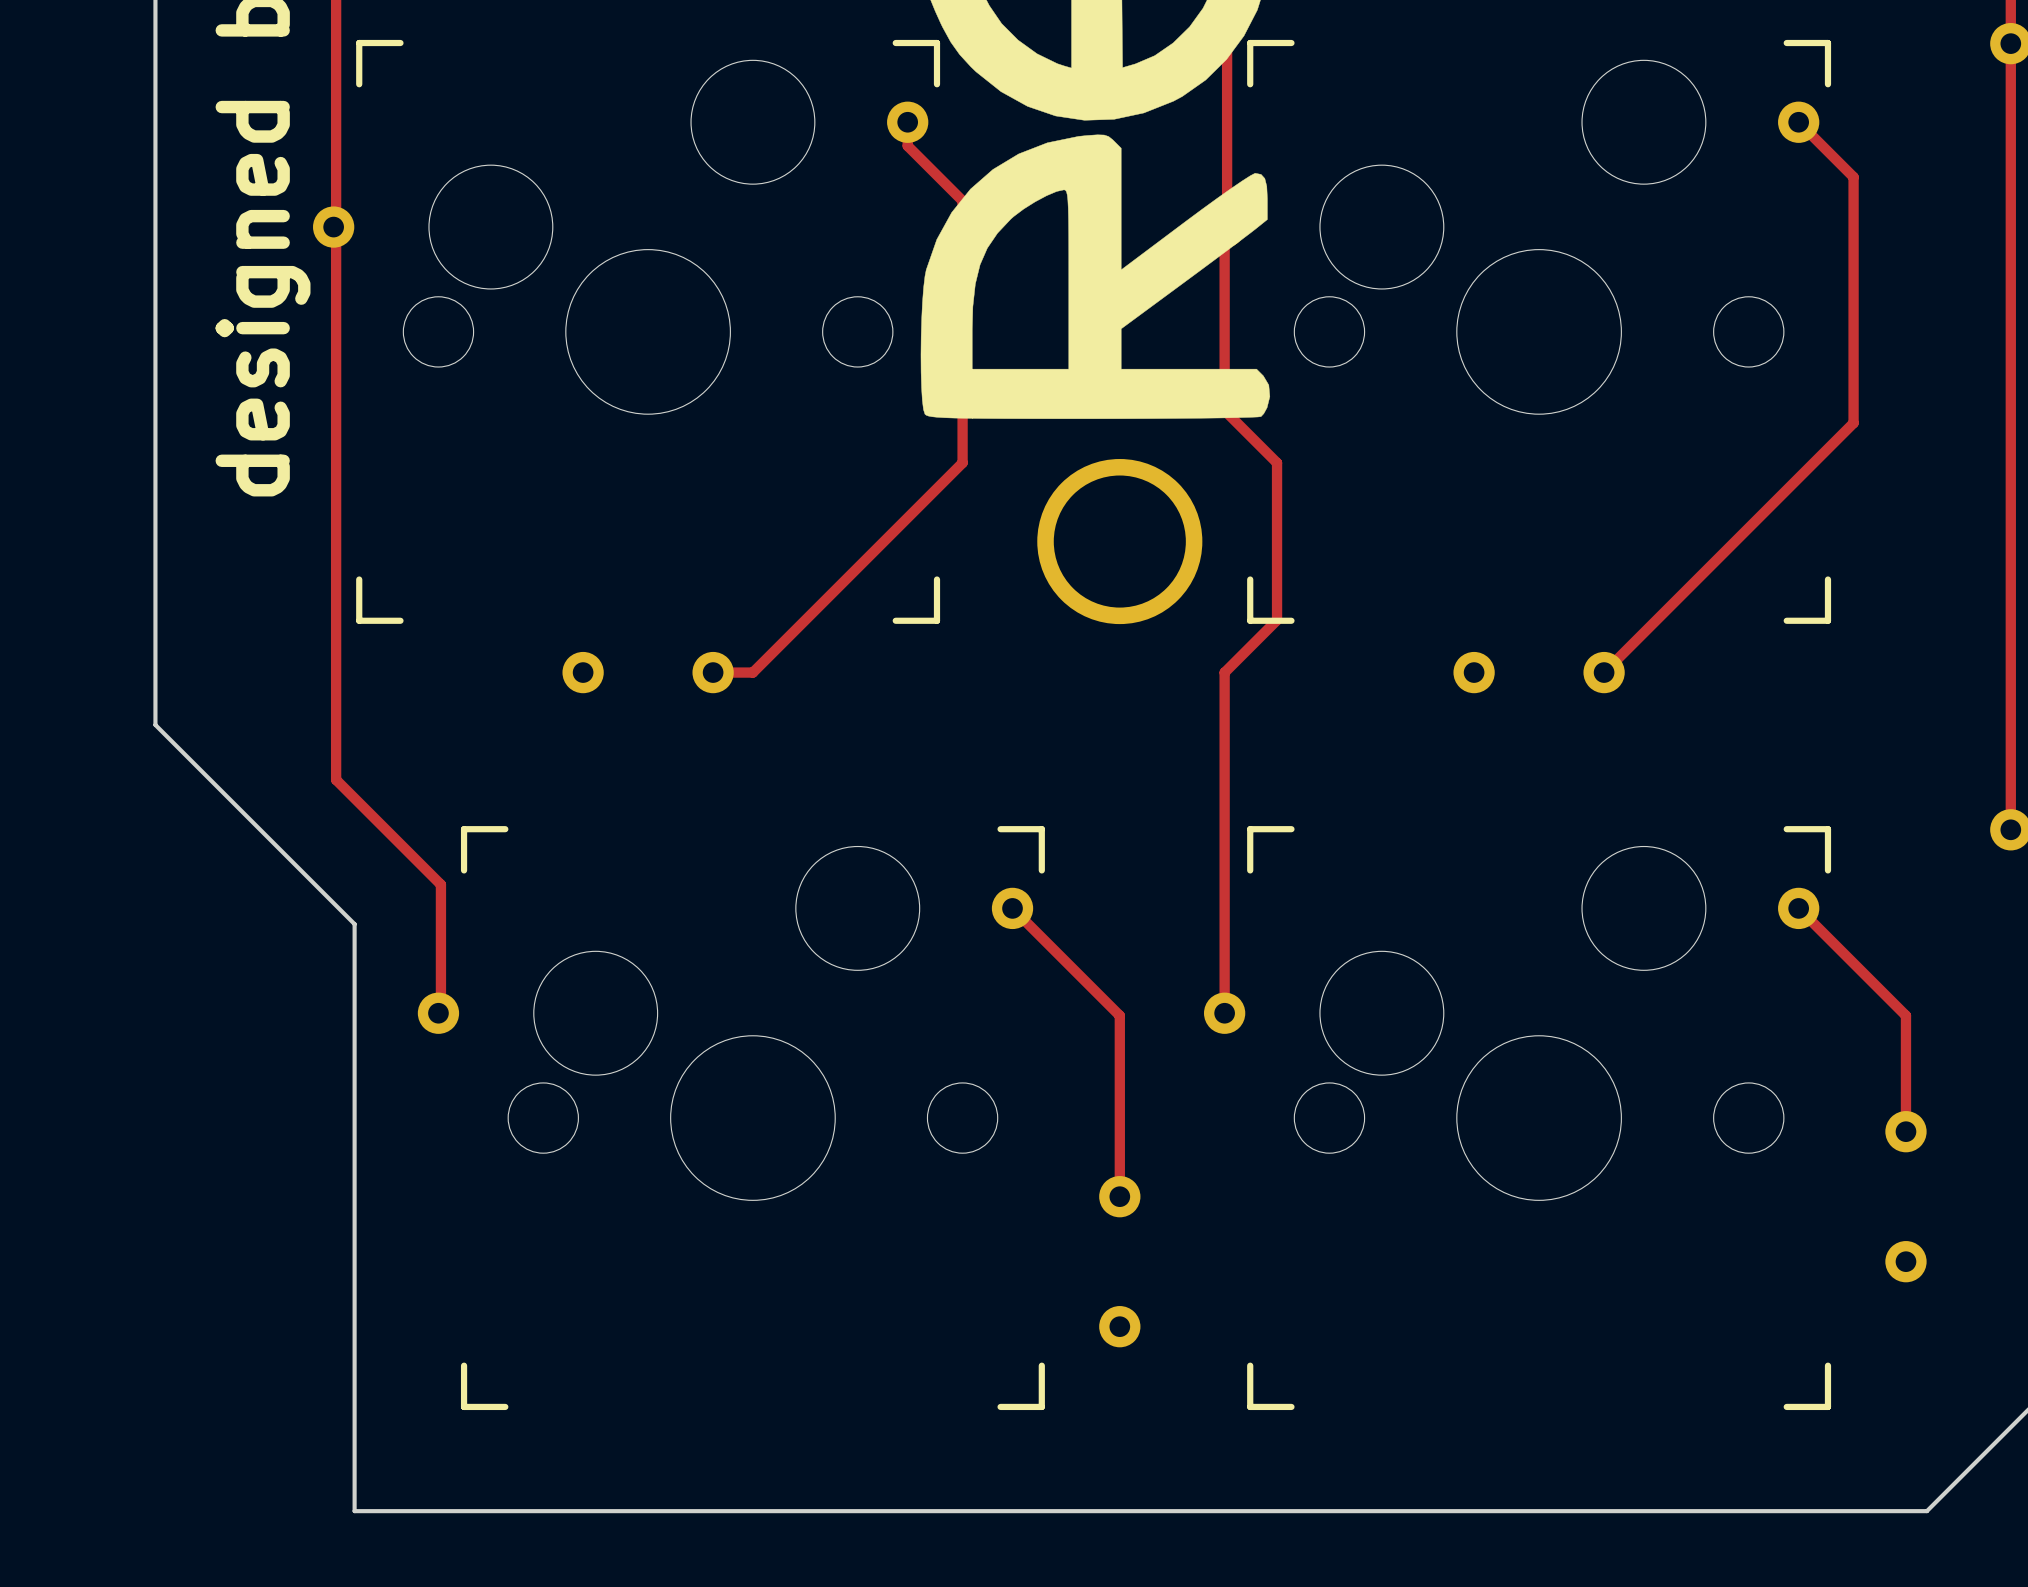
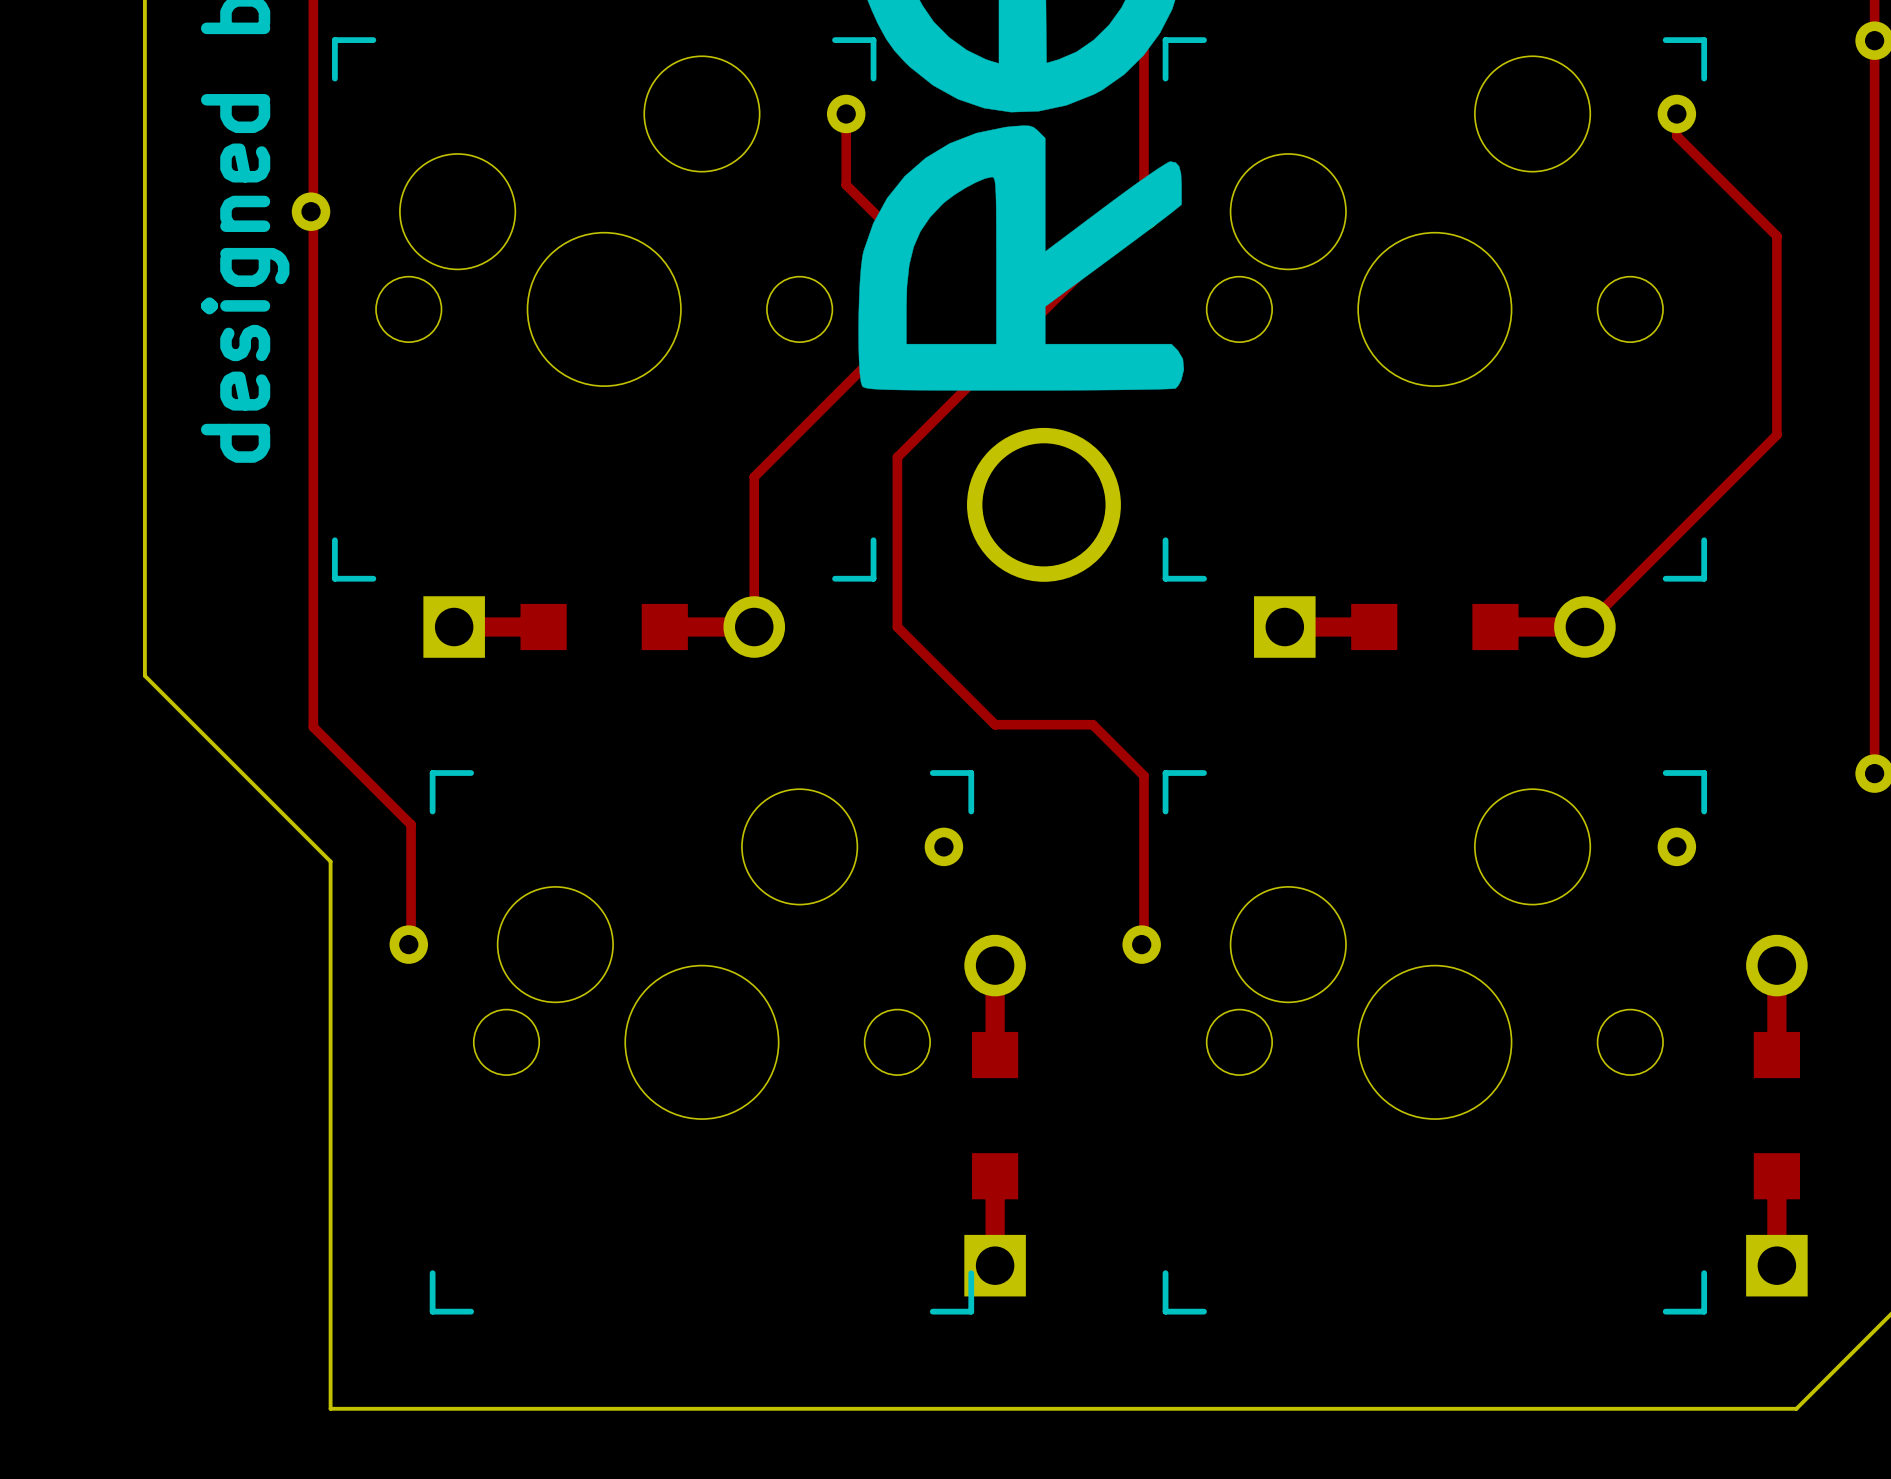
track: (1798, 122) (1853, 177) (1853, 423) (1604, 672) -> (1676, 113) (1676, 136) (1776, 236) (1776, 435) (1584, 627)
track: (907, 145) (962, 200) (962, 253) -> (846, 136) (846, 184) (897, 236)
track: (1224, 227) (1224, 410) (1277, 462) (1277, 620) (1224, 672) (1224, 1013) -> none
track: none -> (1144, 211) (897, 457) (897, 627) (995, 724) (1092, 724) (1144, 775) (1144, 944)
track: (962, 358) (962, 462) (752, 672) (713, 672) -> (897, 333) (754, 476) (754, 627)
part footprint: [562, 651, 734, 694] -> [423, 596, 786, 658]
part footprint: [1453, 651, 1625, 694] -> [1254, 596, 1616, 658]
track: (1012, 908) (1119, 1015) (1119, 1196) -> none
track: (1798, 908) (1905, 1015) (1905, 1131) -> none
part footprint: [1885, 1111, 1927, 1283] -> [1746, 934, 1808, 1297]
part: none -> (995, 1115)
part: (1119, 1261) -> none

